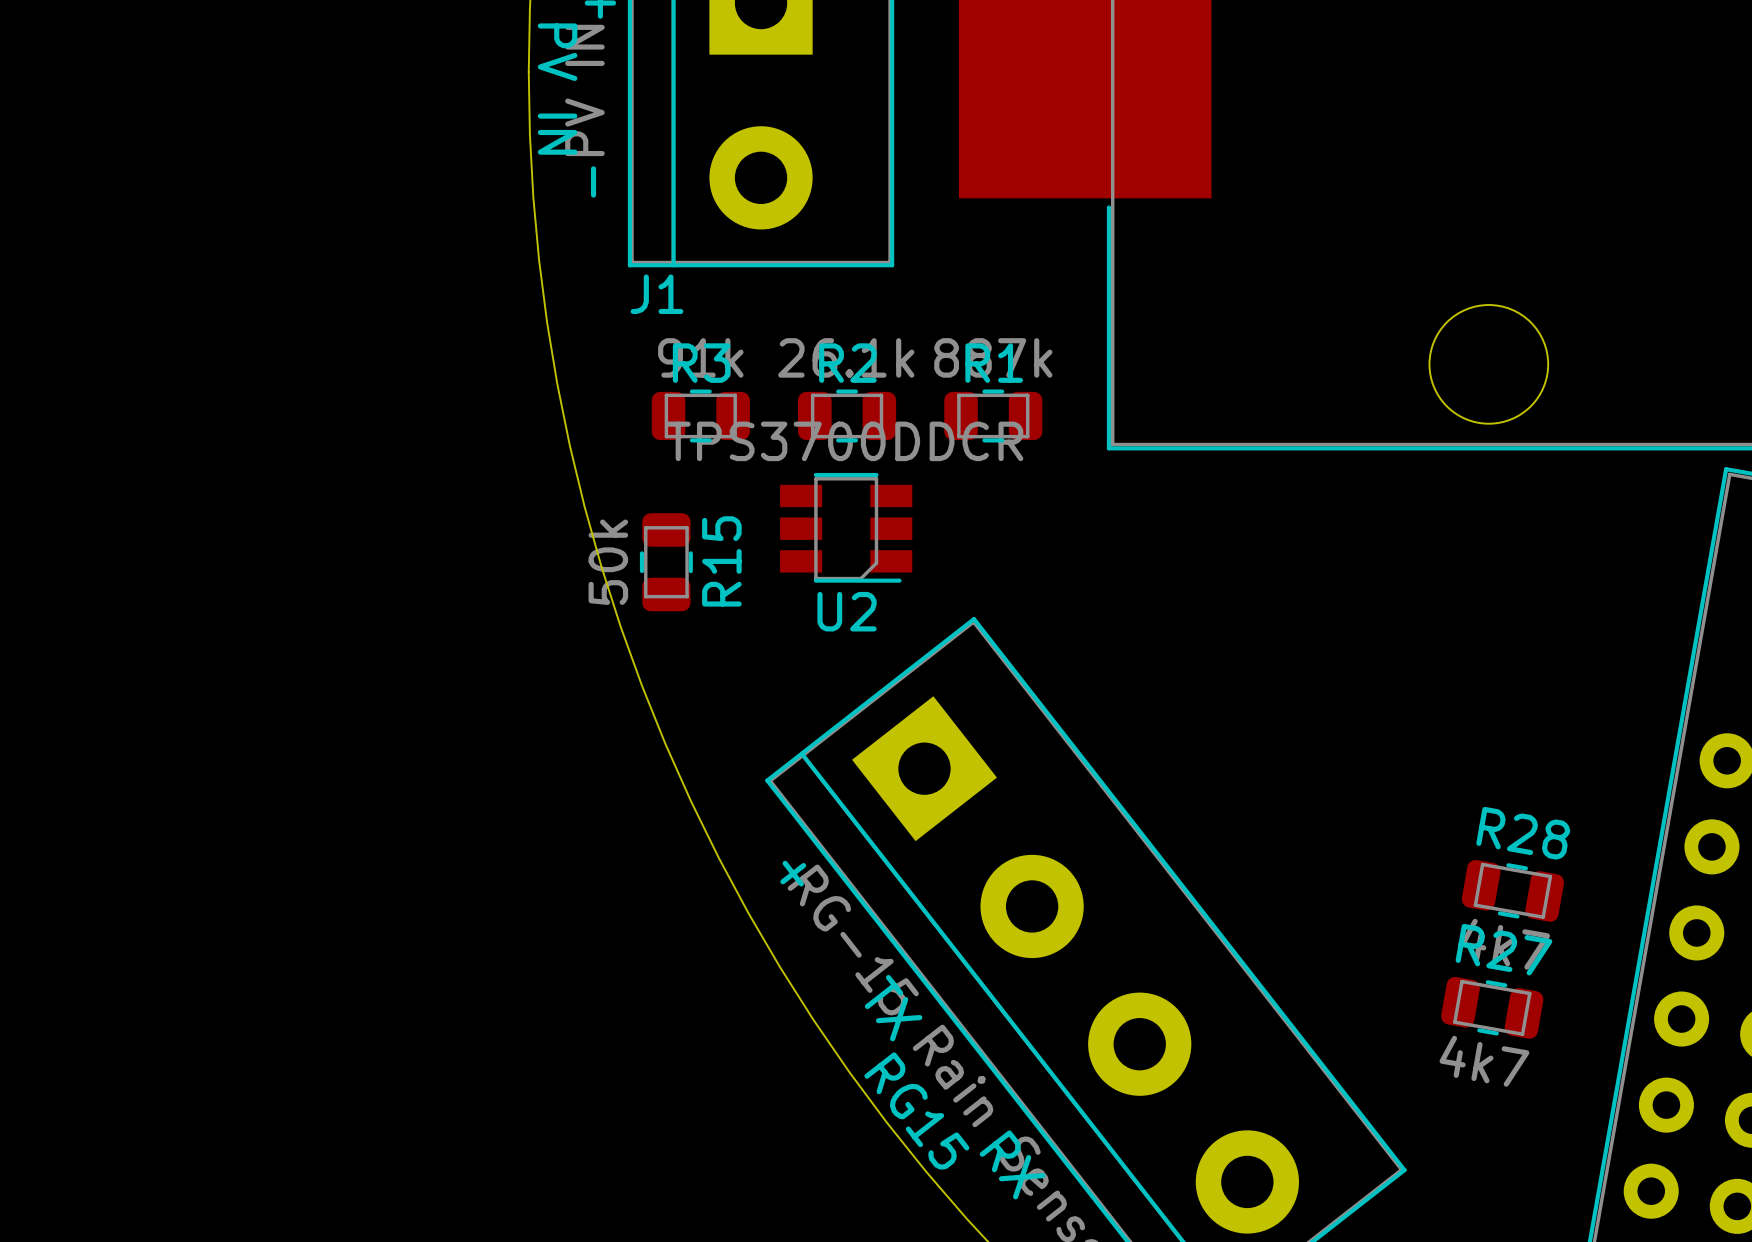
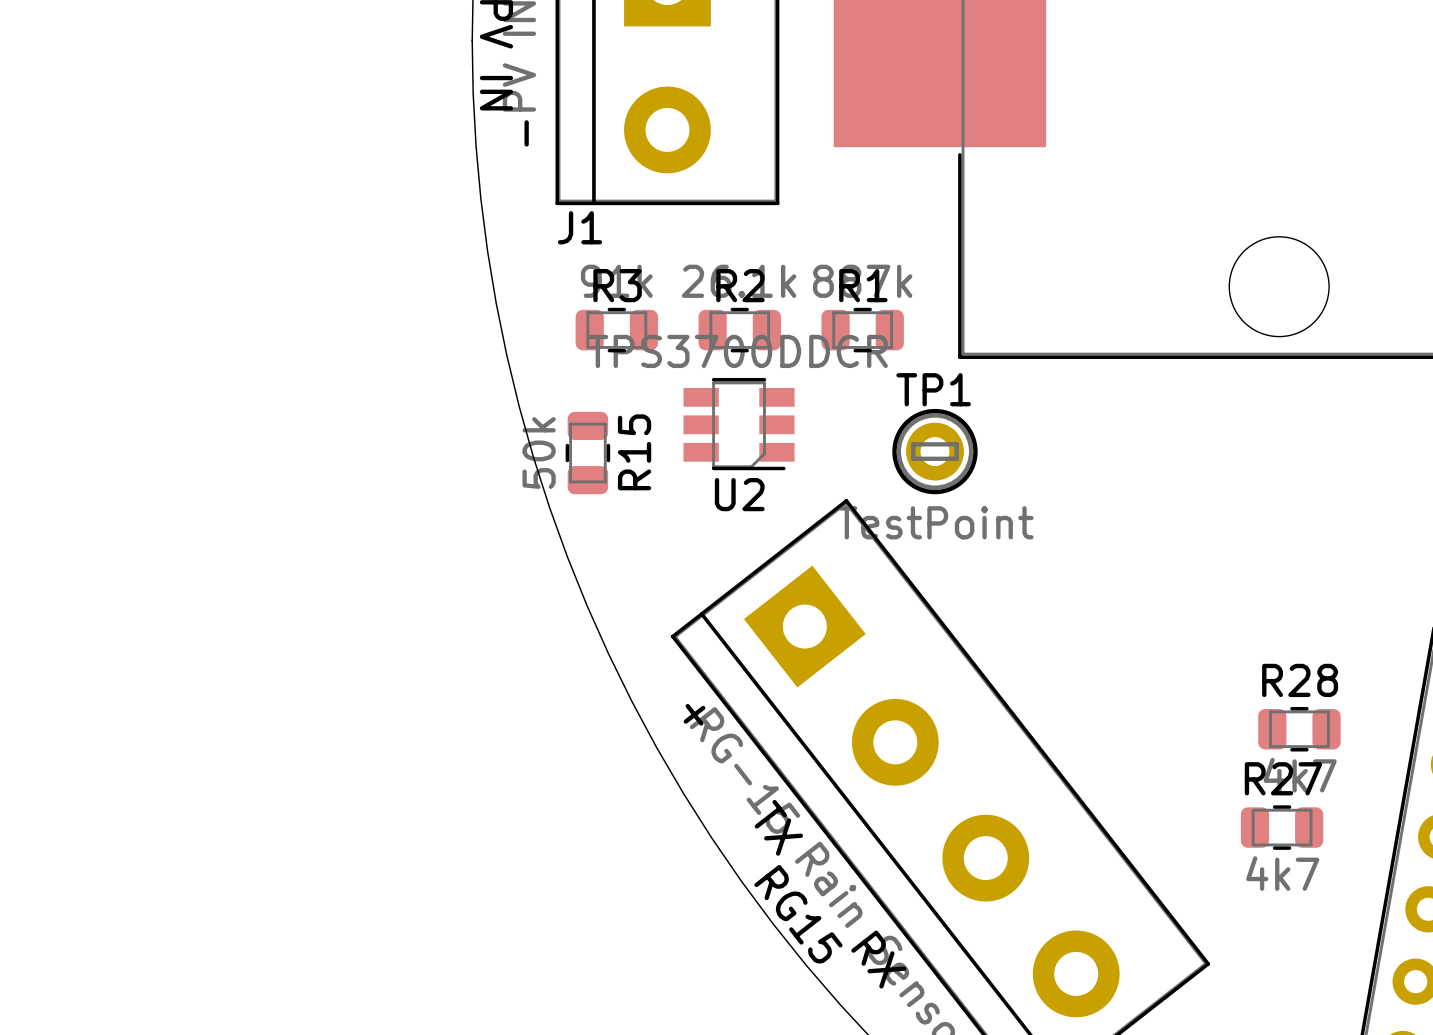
TP1: none -> TestPoint (934, 451)
R28 rotation: 0° (1512, 890) -> 10° counterclockwise (1299, 729)
R27 rotation: 0° (1492, 1007) -> 10° counterclockwise (1282, 827)

